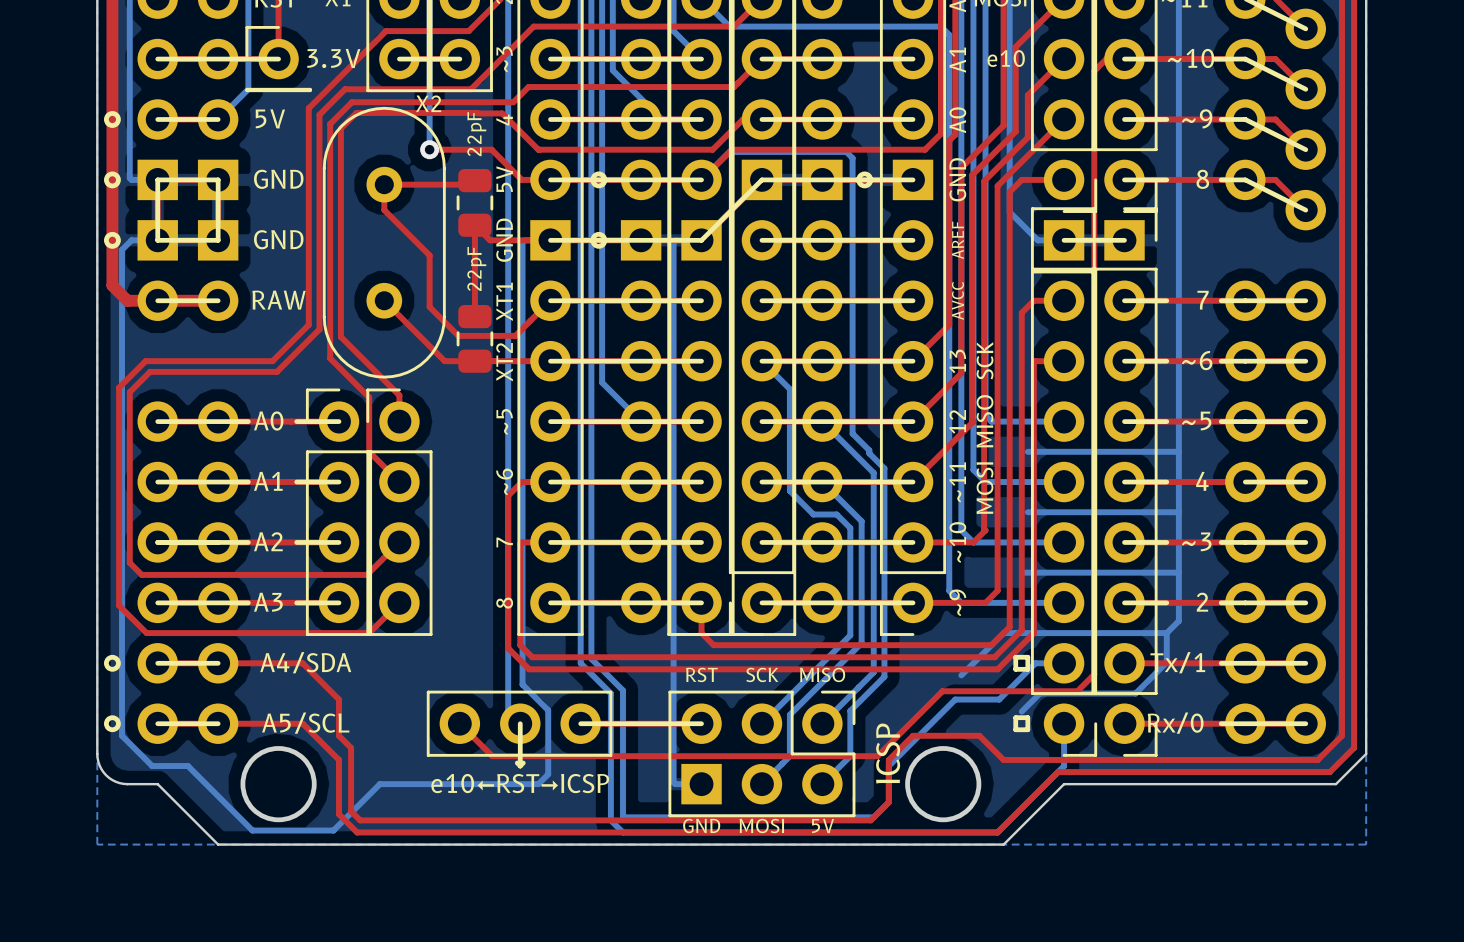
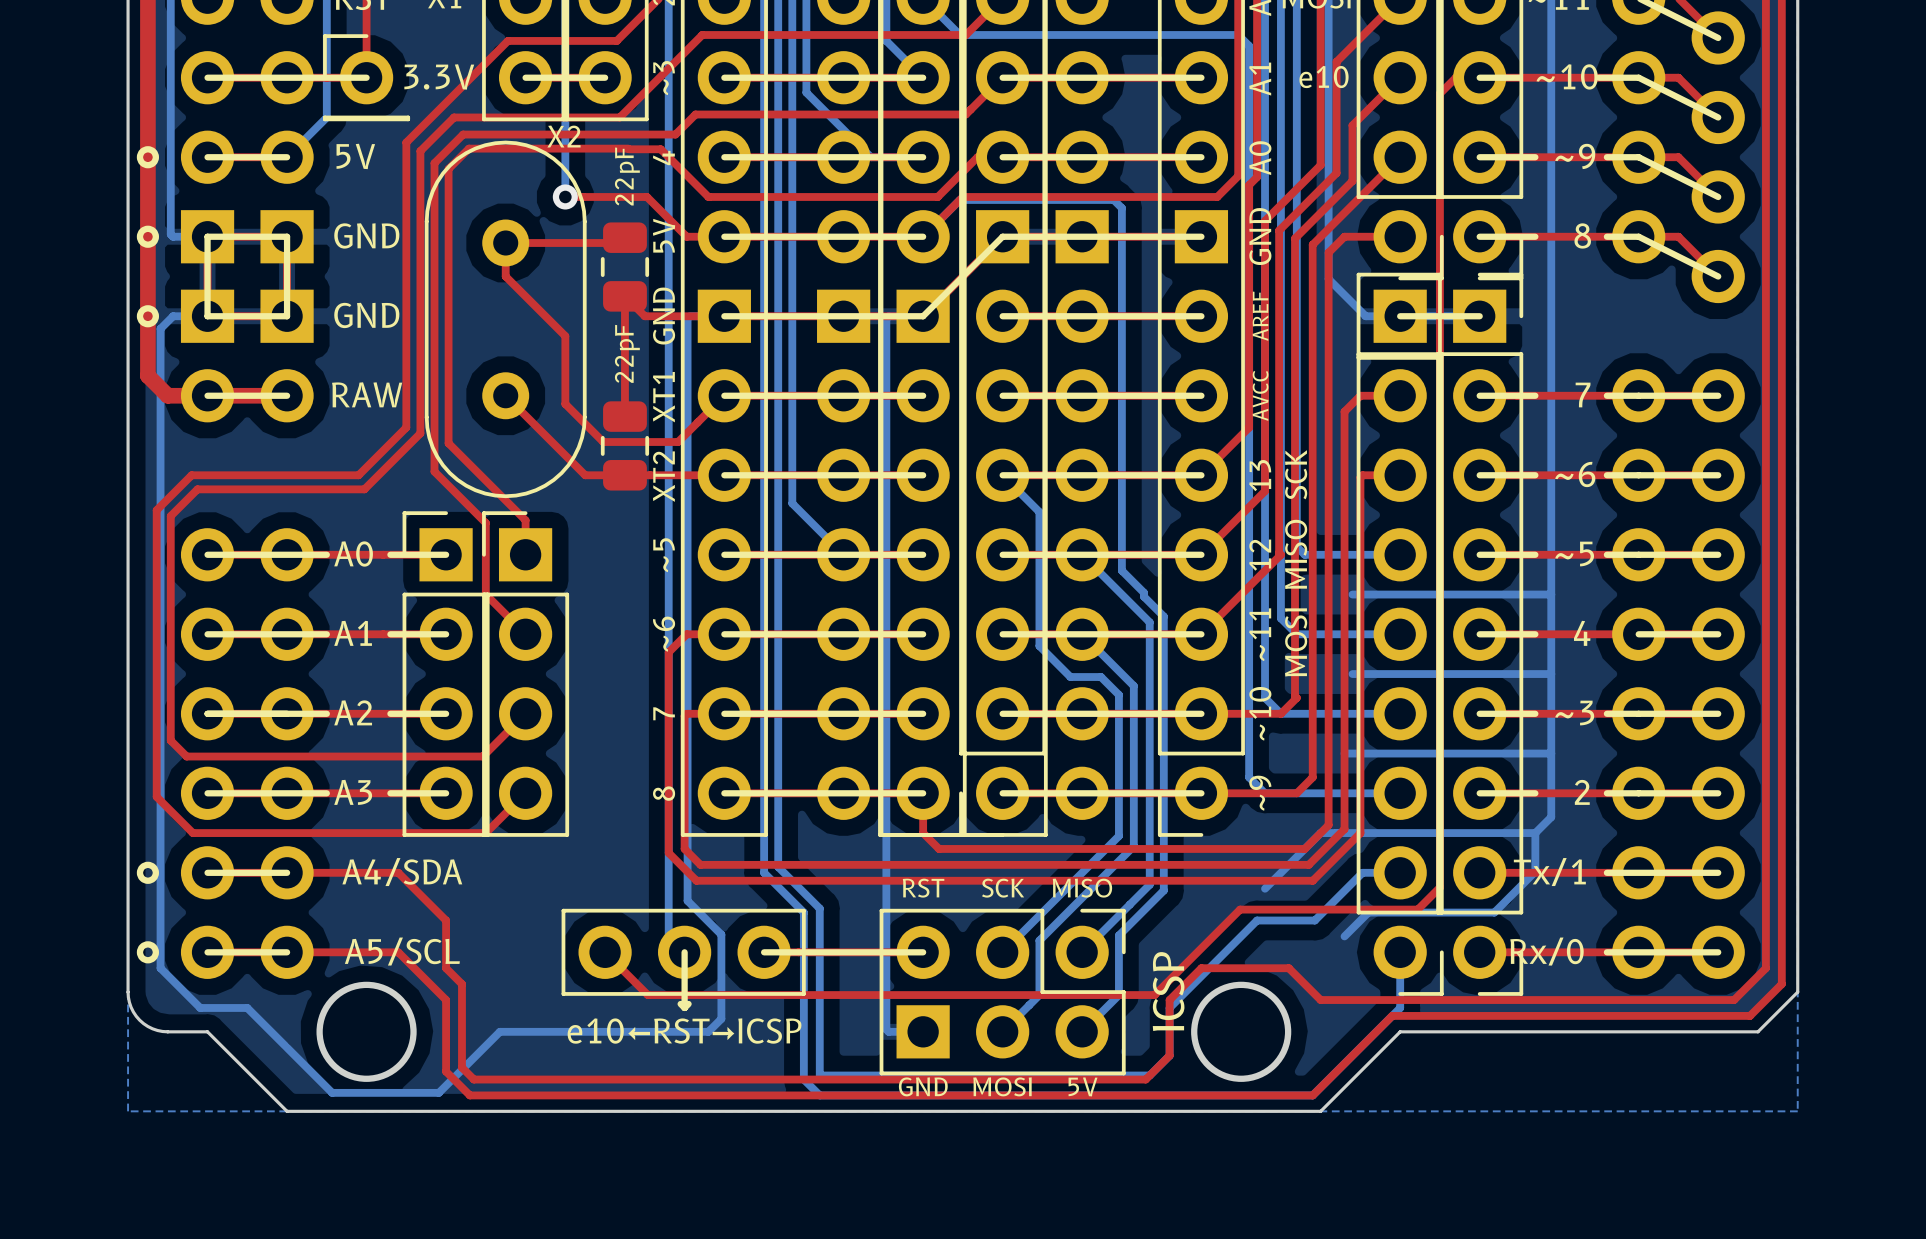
drawing: [590, 171, 608, 189] -> none
drawing: [856, 171, 874, 189] -> none
drawing: [590, 231, 608, 249] -> none
part footprint: [305, 388, 373, 636] -> [402, 511, 490, 837]
part footprint: [366, 388, 433, 636] -> [482, 511, 570, 837]
line: (1015, 657) (1015, 669) (1027, 669) (1027, 657) (1015, 657) -> none
line: (1015, 717) (1015, 729) (1027, 729) (1027, 717) (1015, 717) -> none

